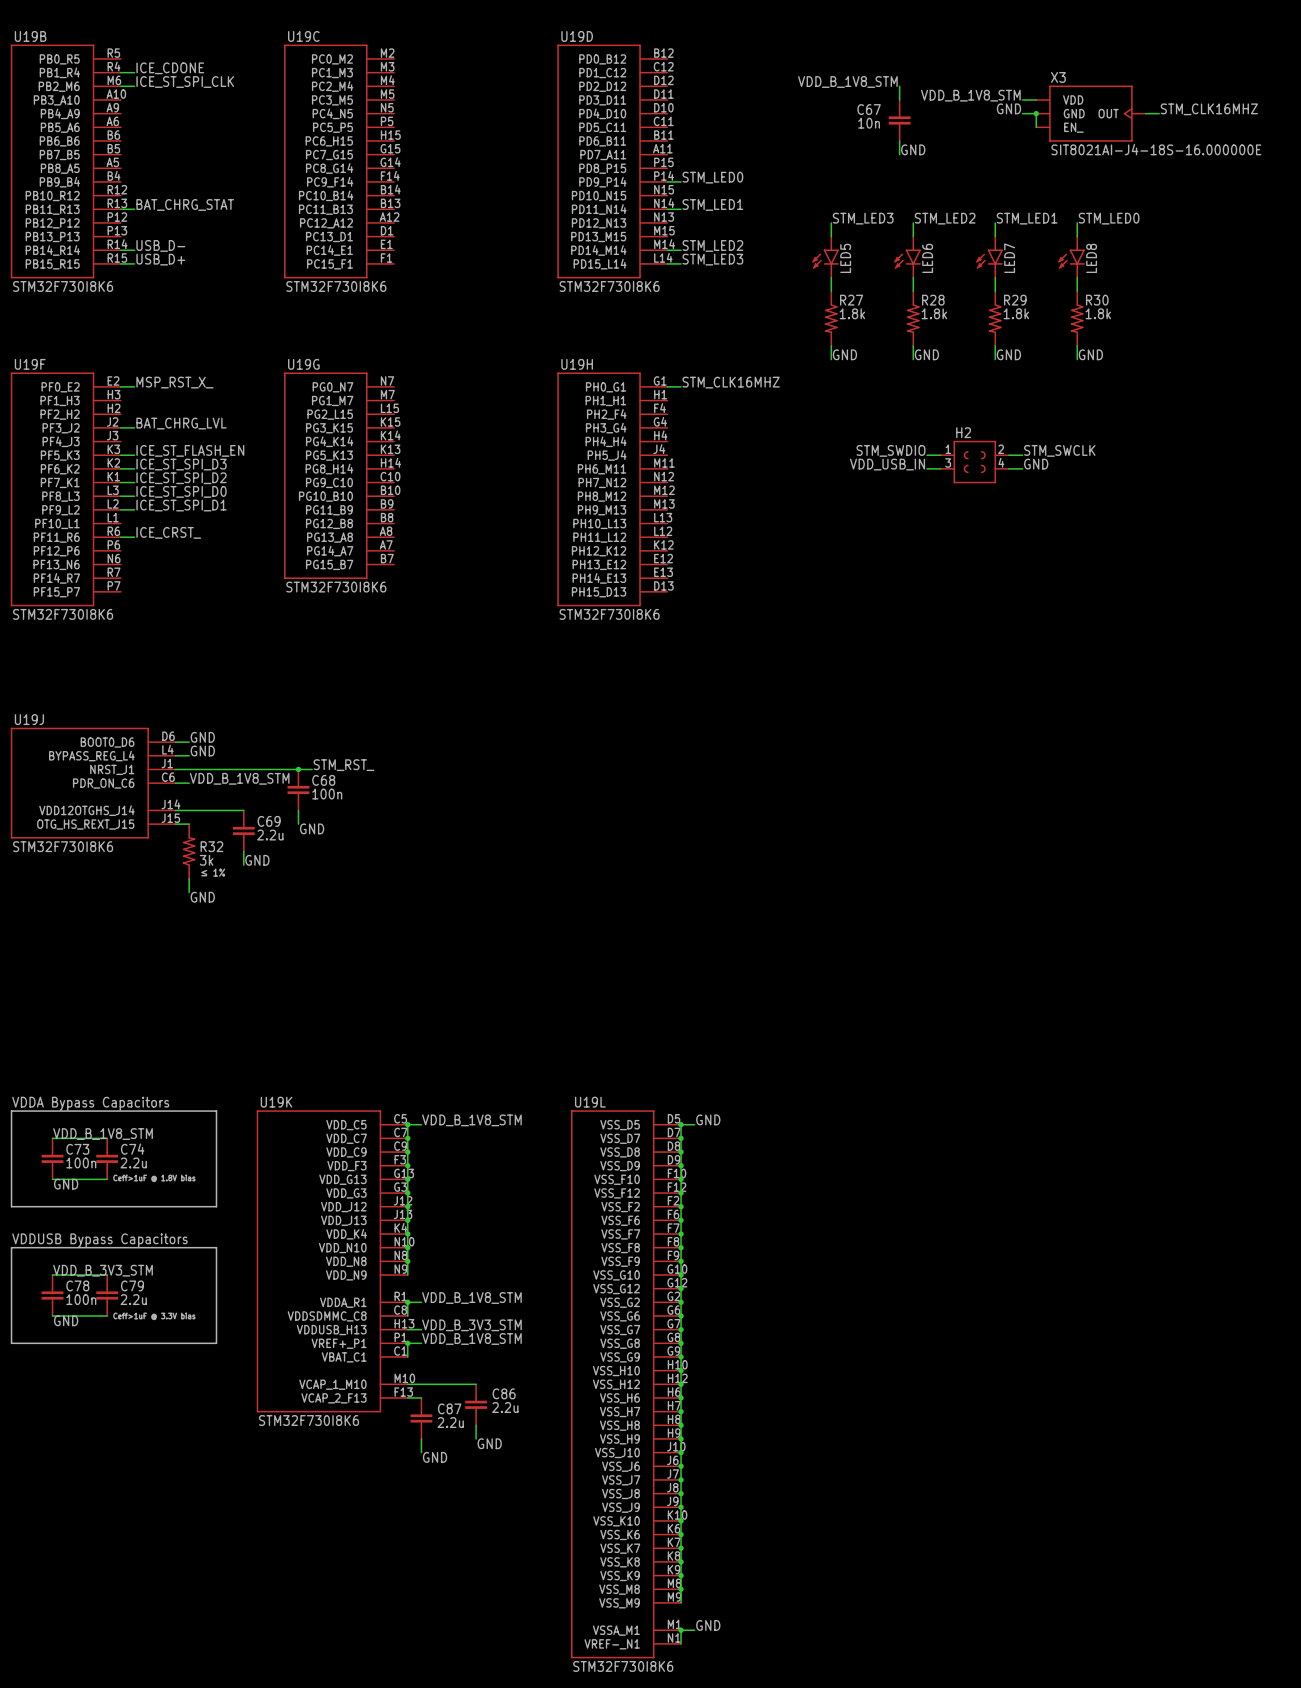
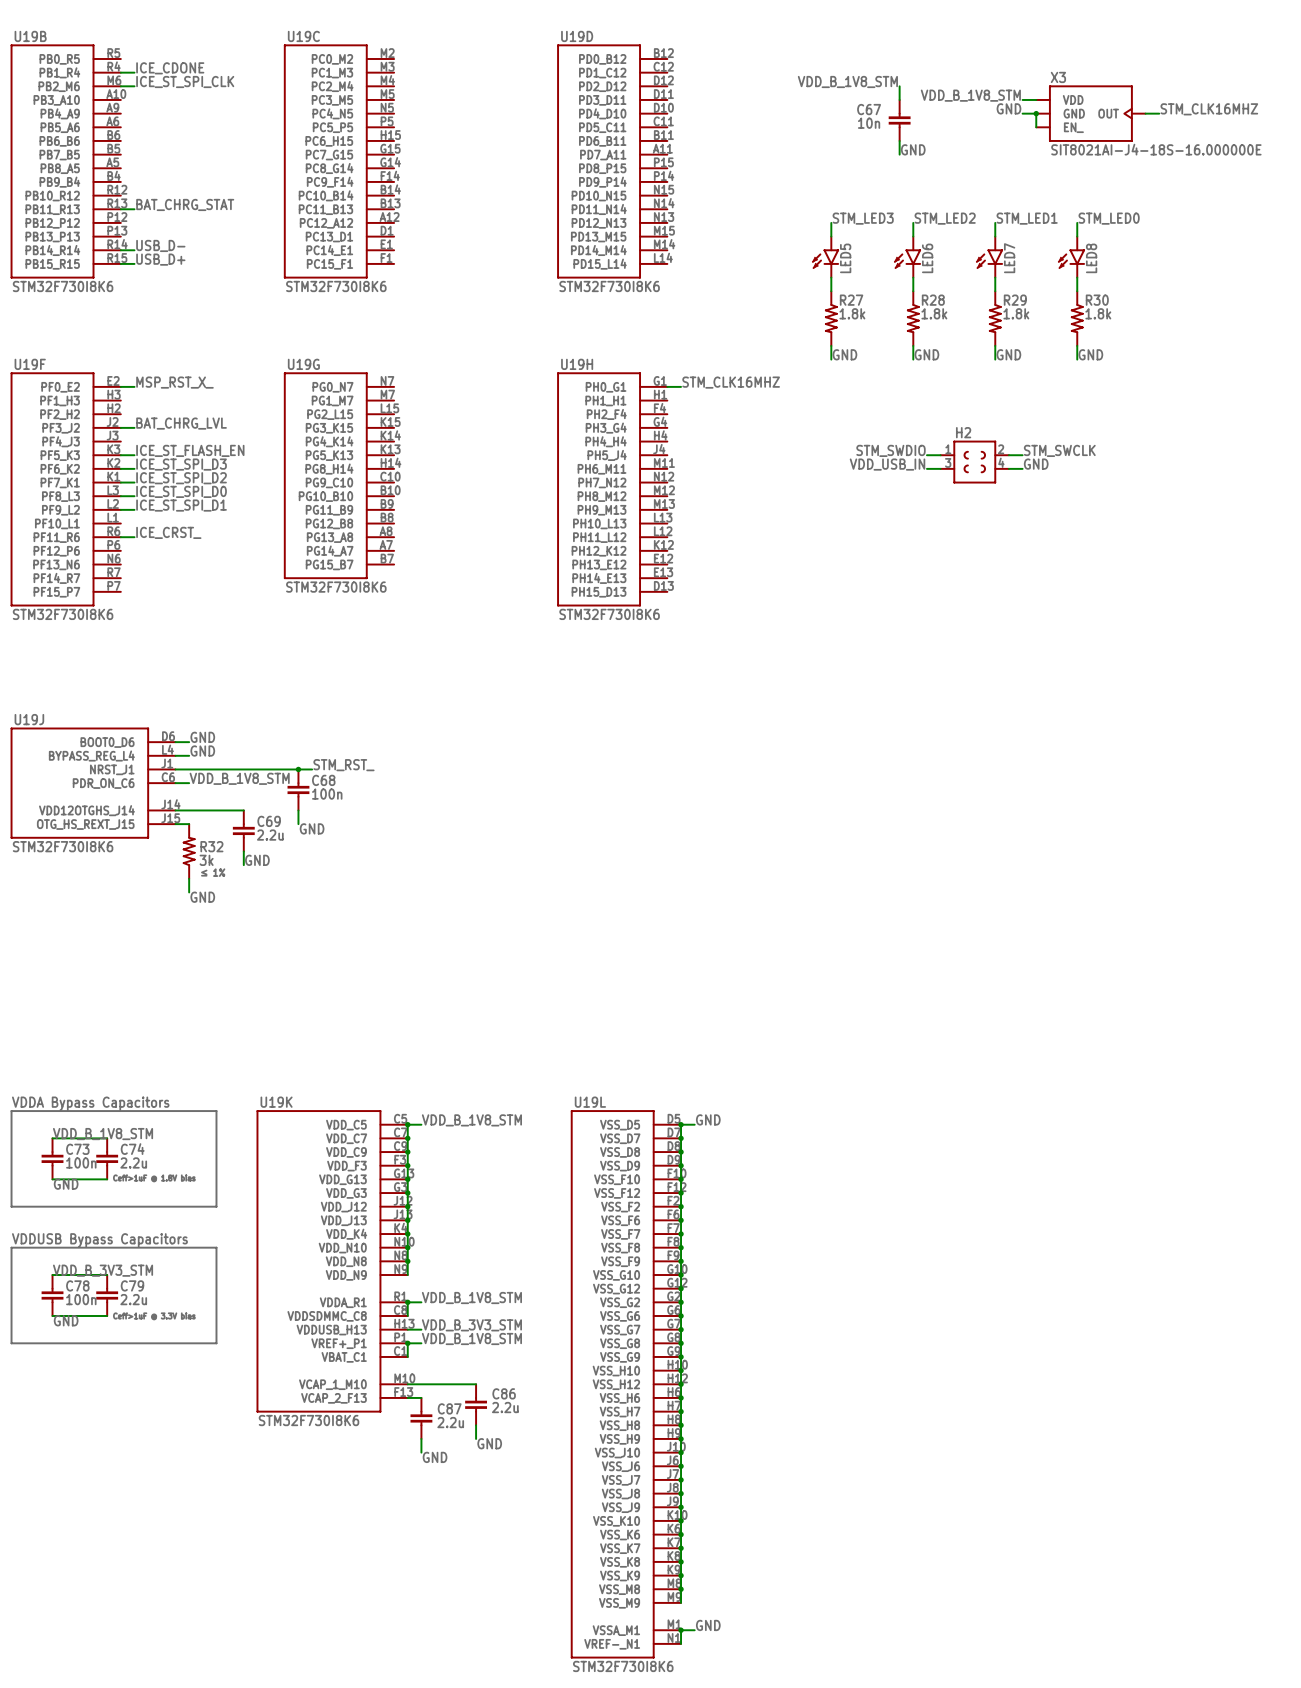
label: STM_LED0 (712, 177) -> none
wire: (667, 181) (681, 181) -> none
label: STM_LED1 (712, 204) -> none
wire: (667, 209) (681, 209) -> none
label: STM_LED2 (712, 245) -> none
wire: (667, 250) (681, 250) -> none
label: STM_LED3 (712, 259) -> none
wire: (667, 263) (681, 263) -> none

